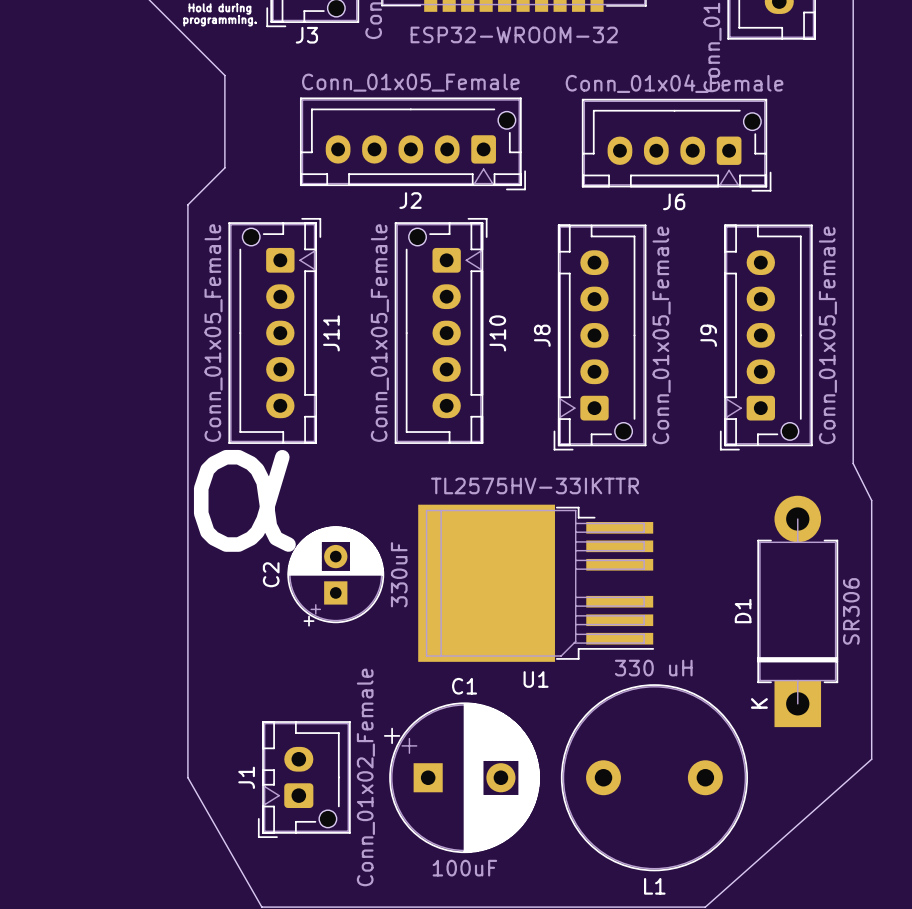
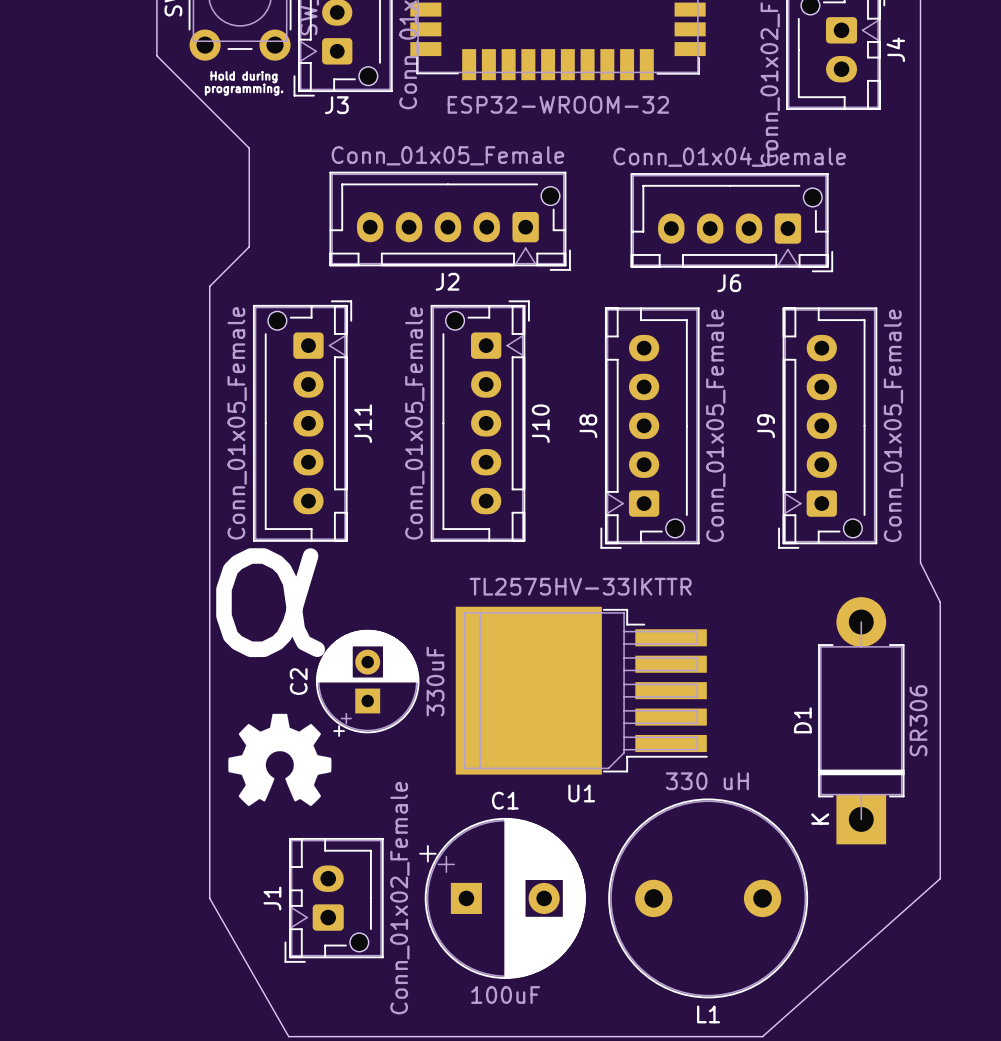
U1 footprint: [418, 504, 655, 662] -> [455, 606, 708, 775]
drawing: none -> [228, 713, 332, 807]

